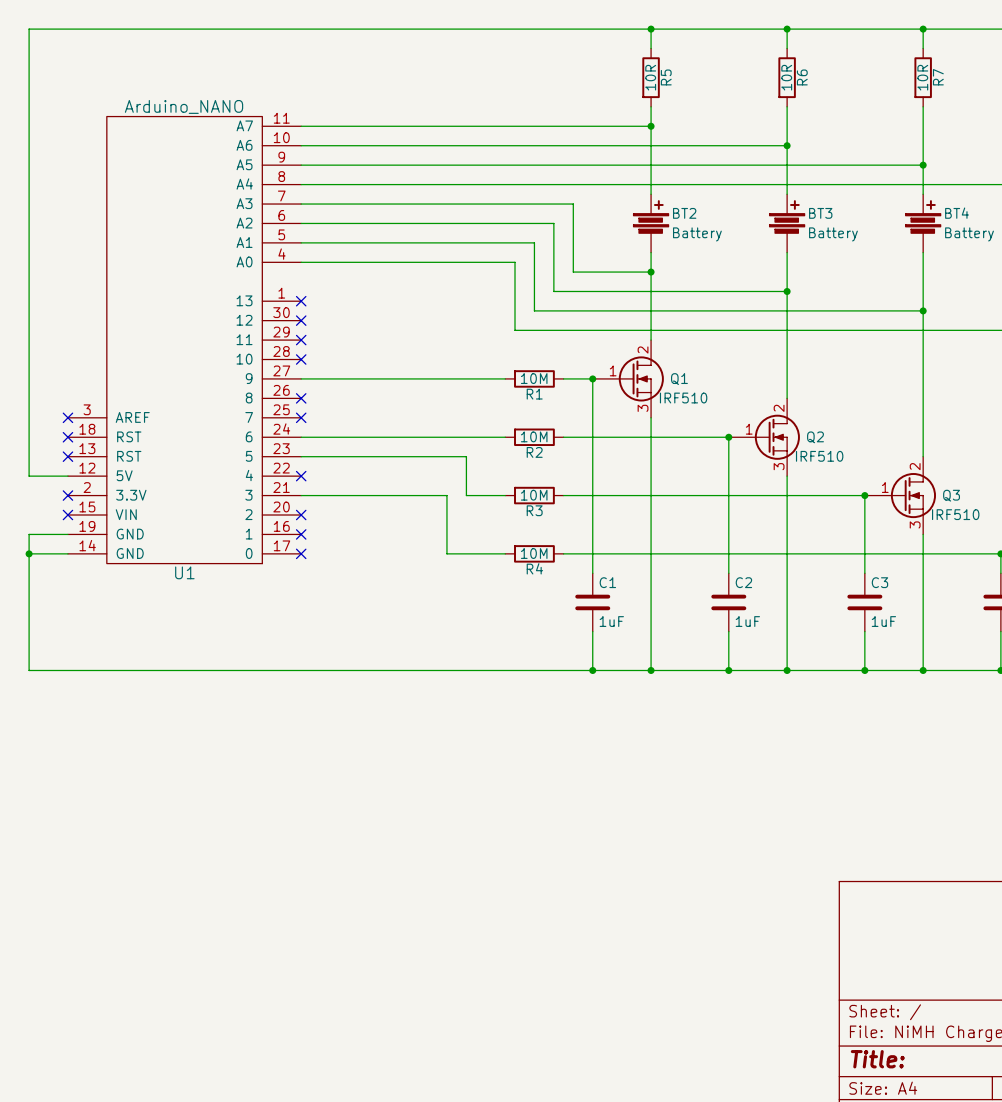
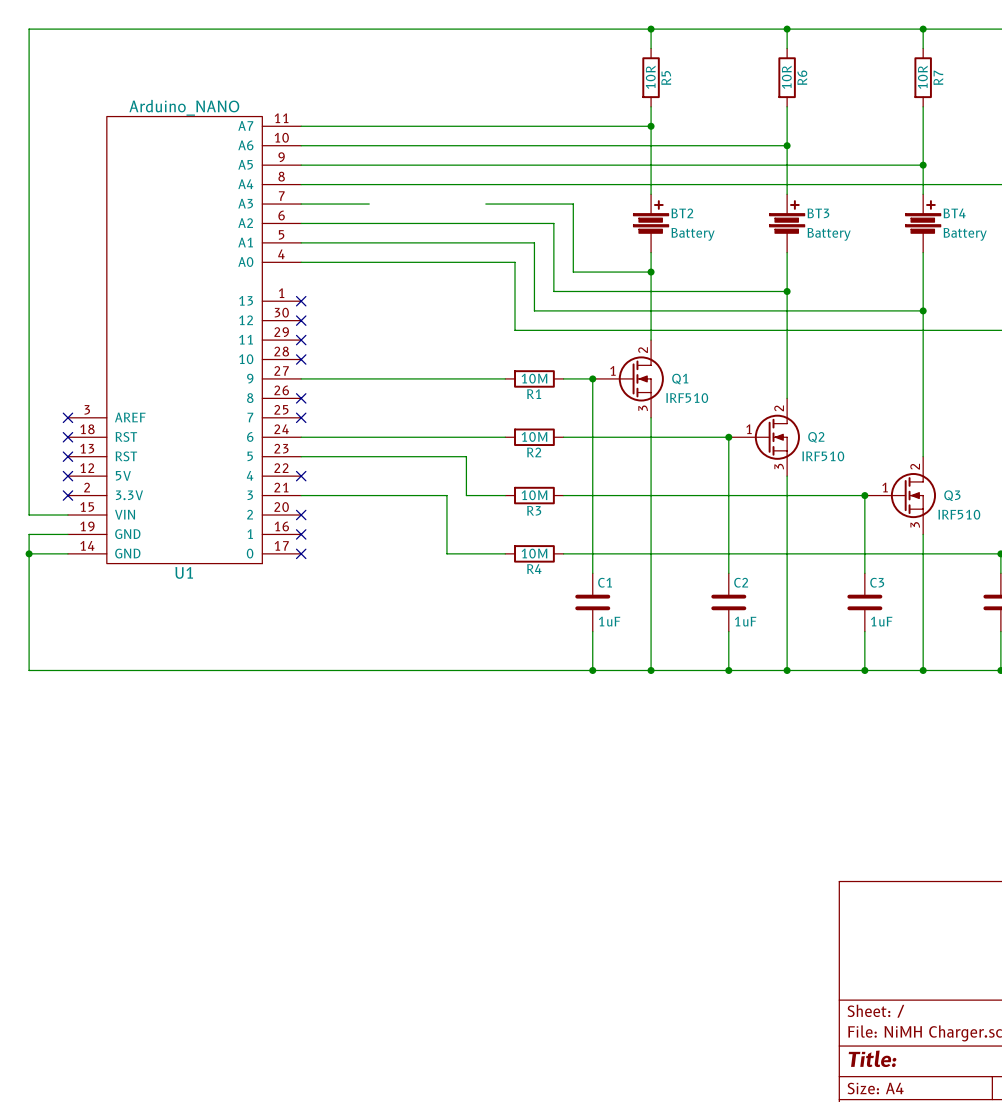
wire: (369, 204) (485, 204) -> none
wire: (29, 476) (67, 476) -> (29, 476) (29, 515) (67, 515)
no-connect mark position: (67, 515) -> (67, 476)

